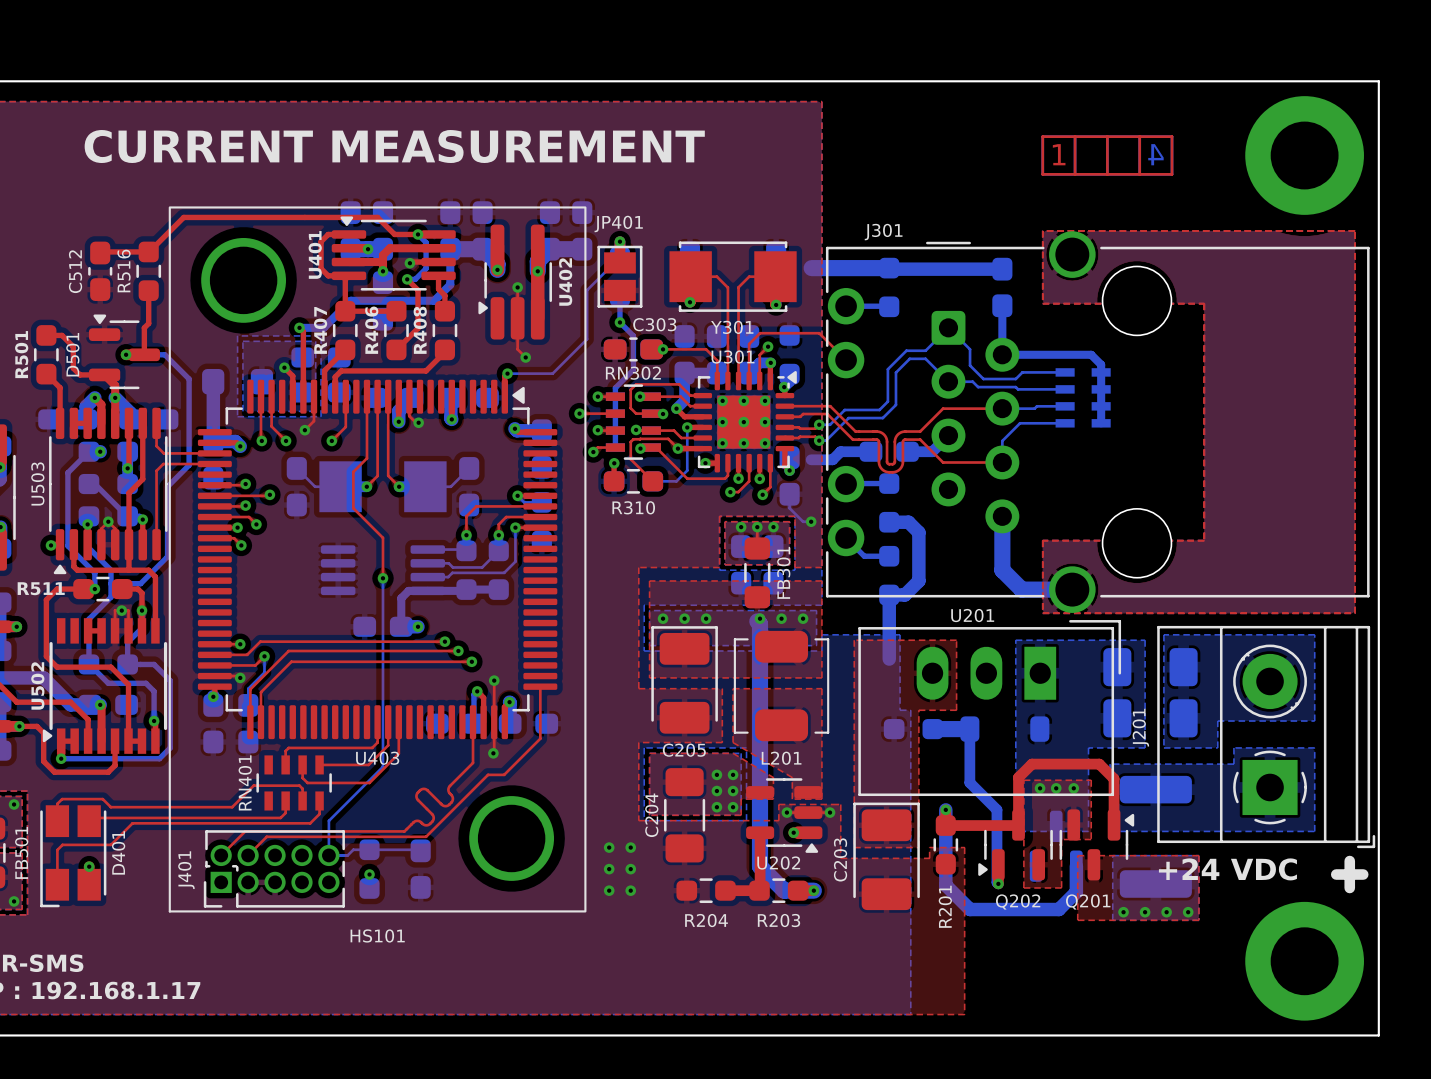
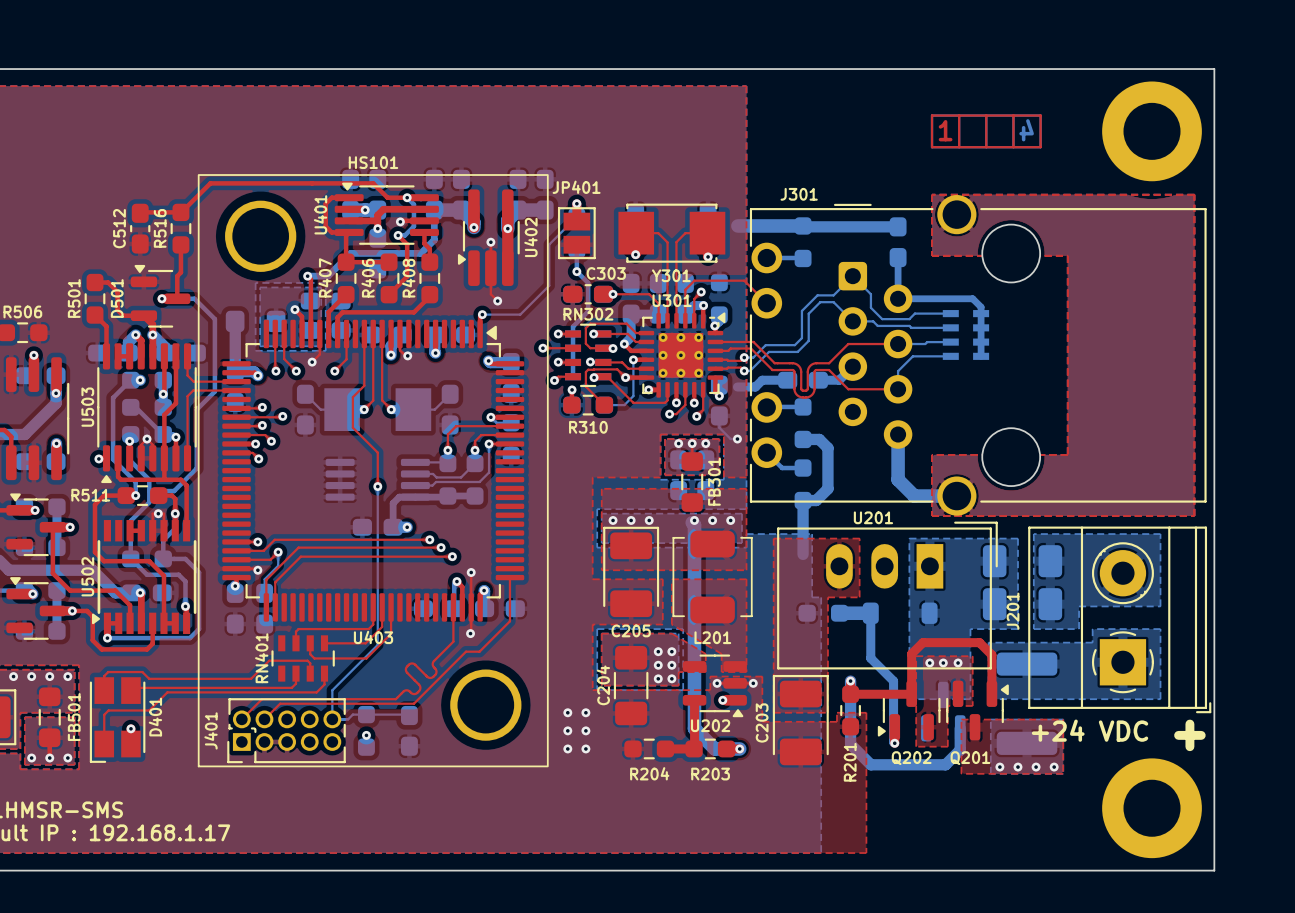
text: CURRENT MEASUREMENT (394, 146) -> none
HS101 name position: HS101 (377, 935) -> HS101 (373, 162)

